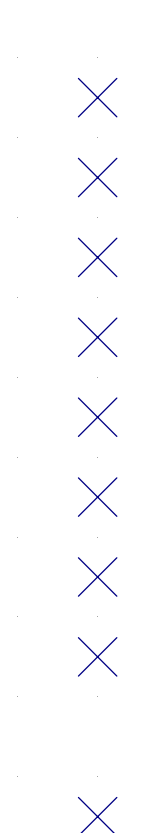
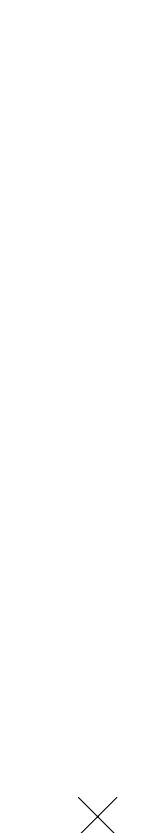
no-connect mark: (97, 97) -> none
no-connect mark: (97, 177) -> none
no-connect mark: (97, 257) -> none
no-connect mark: (97, 337) -> none
no-connect mark: (97, 417) -> none
no-connect mark: (97, 497) -> none
no-connect mark: (97, 576) -> none
no-connect mark: (97, 656) -> none

